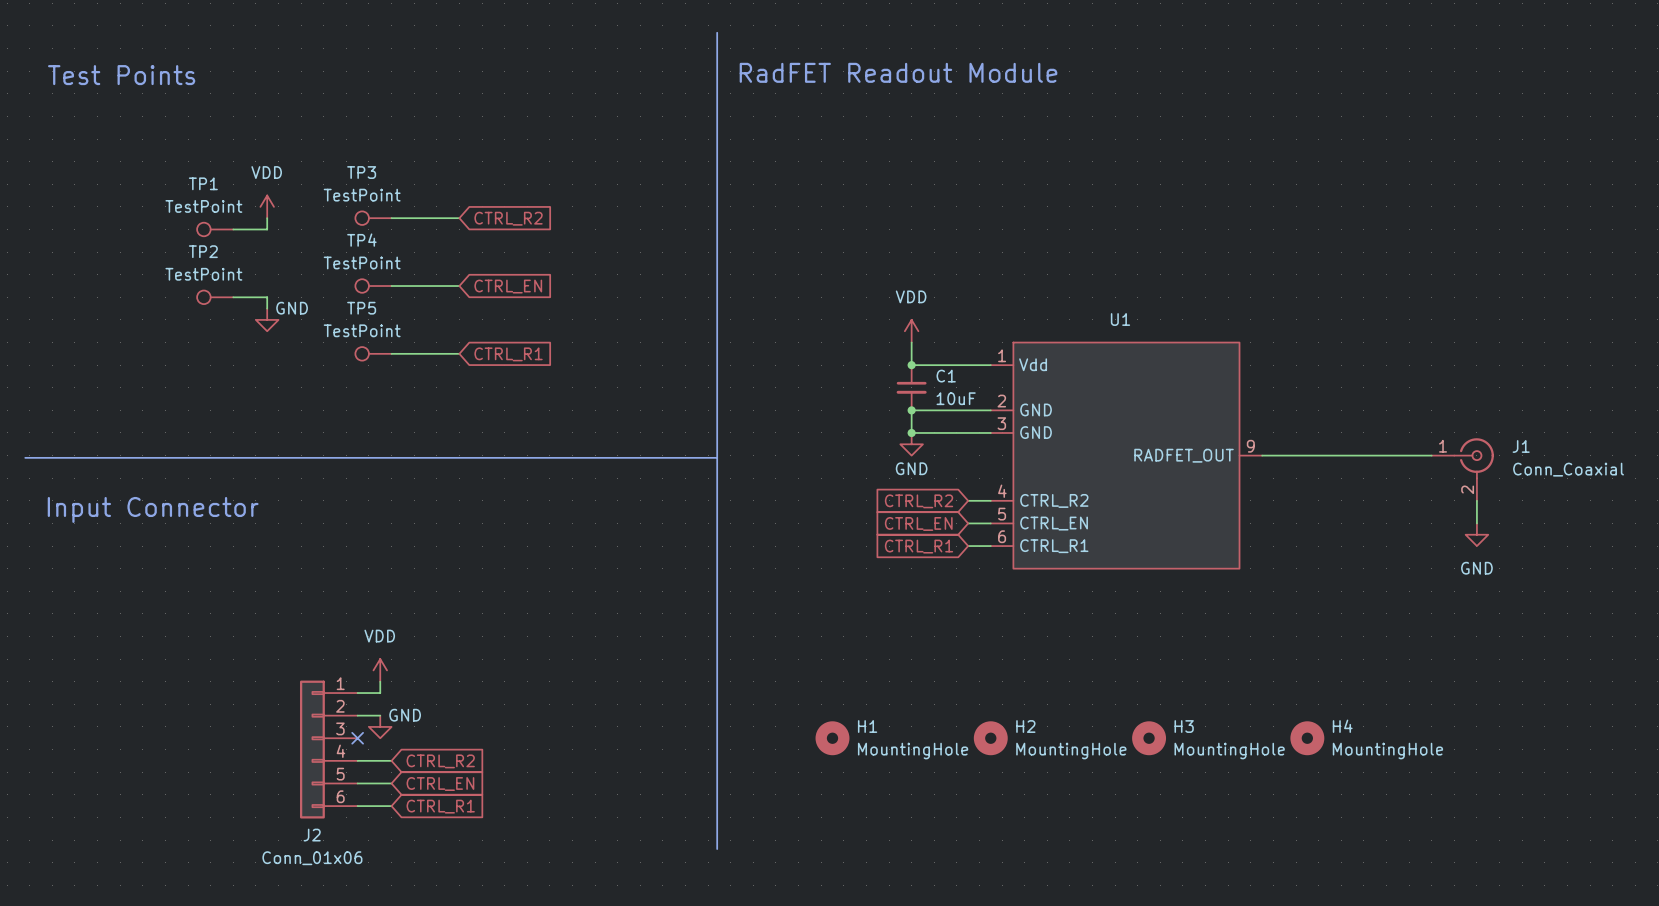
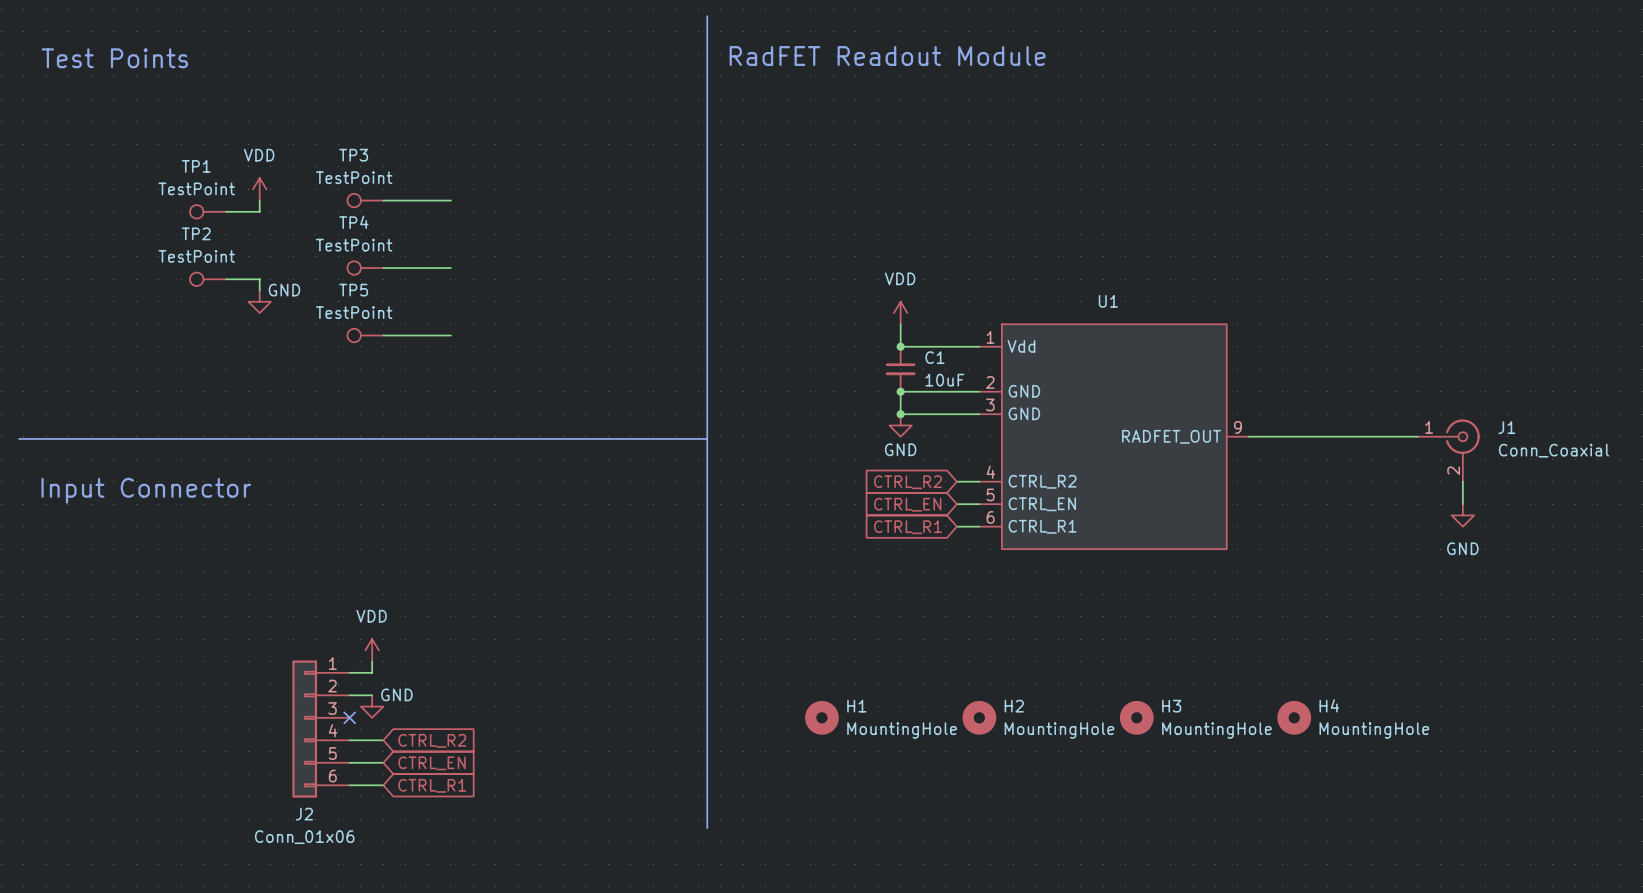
global label: CTRL_R2 (508, 218) -> none
global label: CTRL_EN (508, 286) -> none
global label: CTRL_R1 (508, 354) -> none

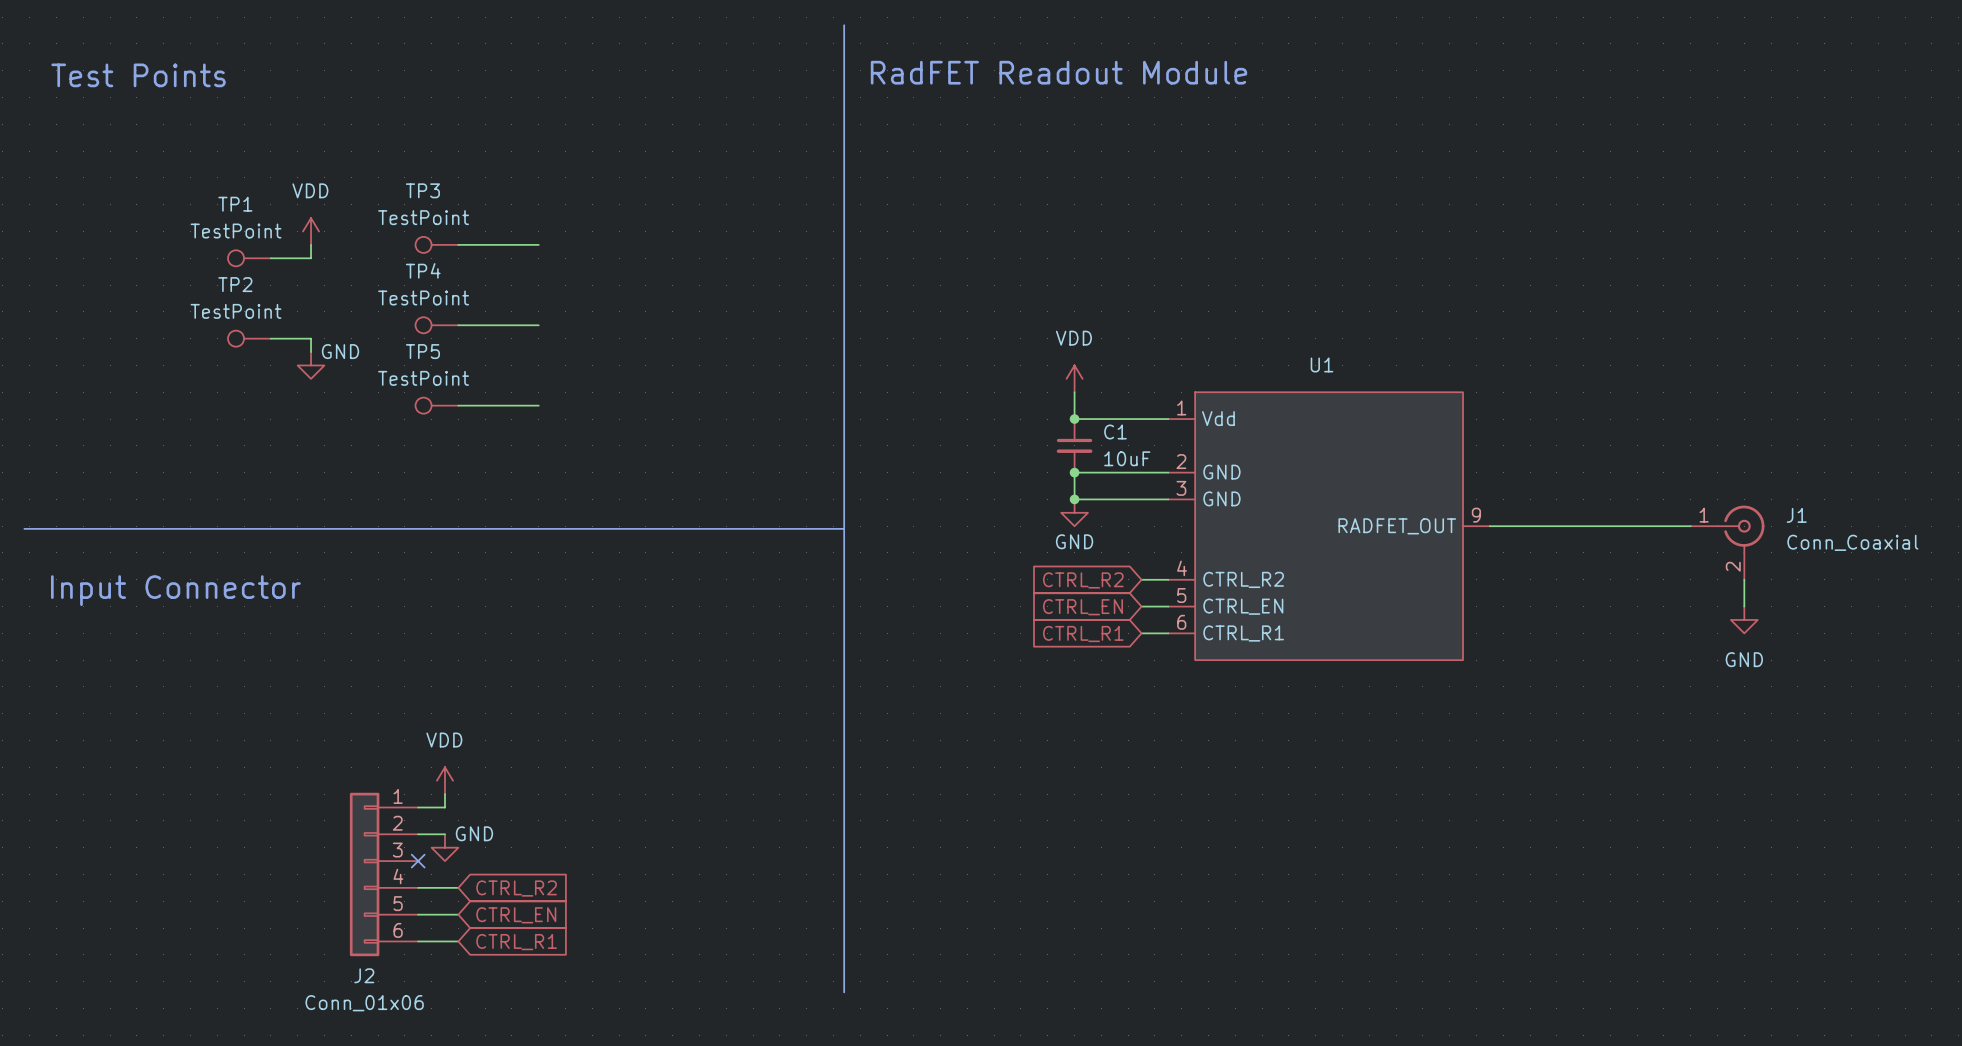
H1: MountingHole (821, 717) -> none
H2: MountingHole (979, 717) -> none
H3: MountingHole (1136, 717) -> none
H4: MountingHole (1294, 717) -> none

